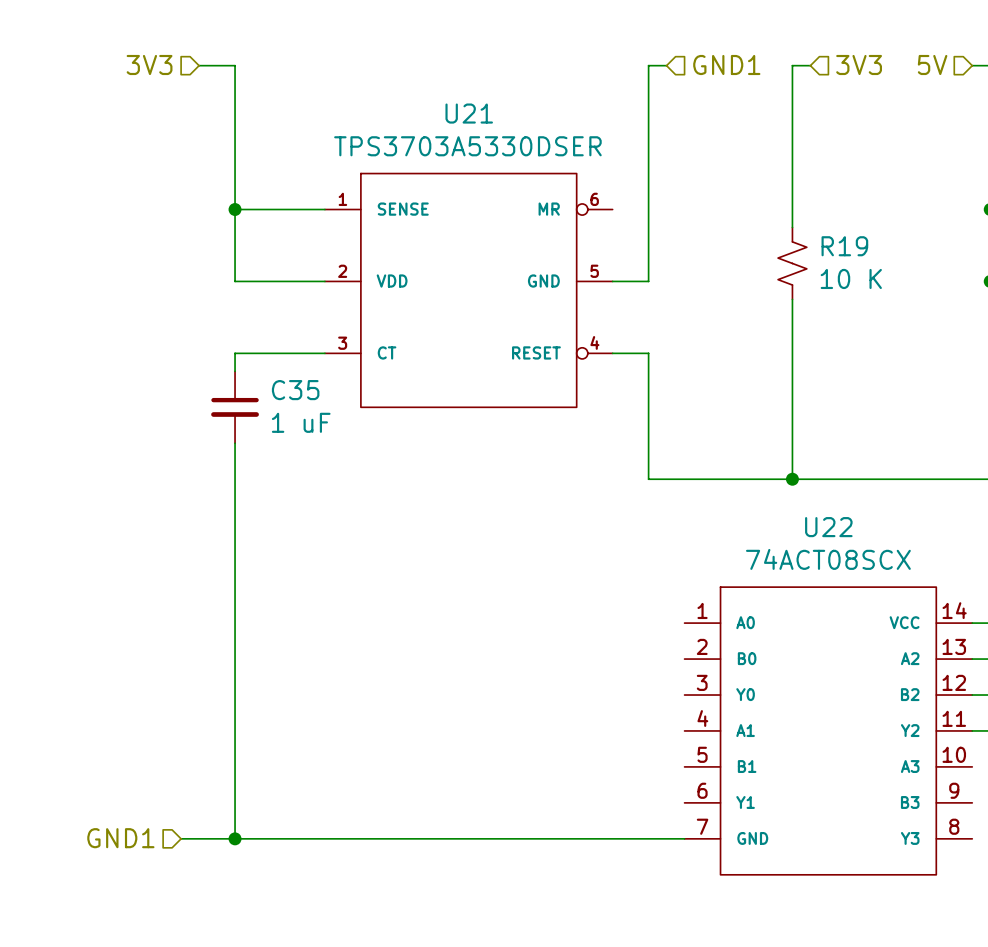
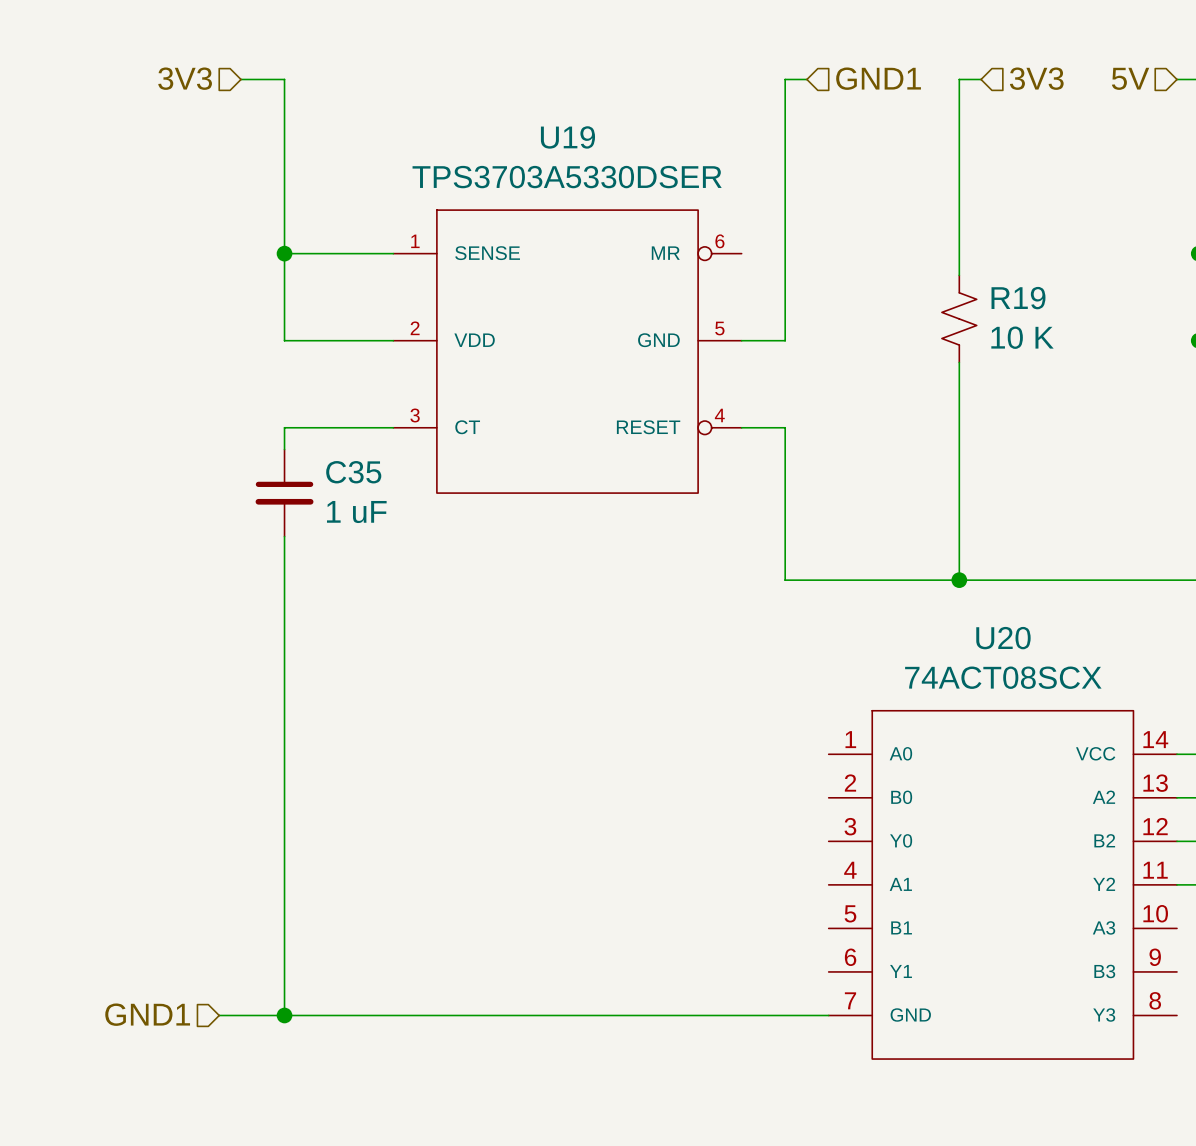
U21 name: U21 (469, 113) -> U19 (567, 137)
U22 name: U22 (828, 527) -> U20 (1003, 638)

